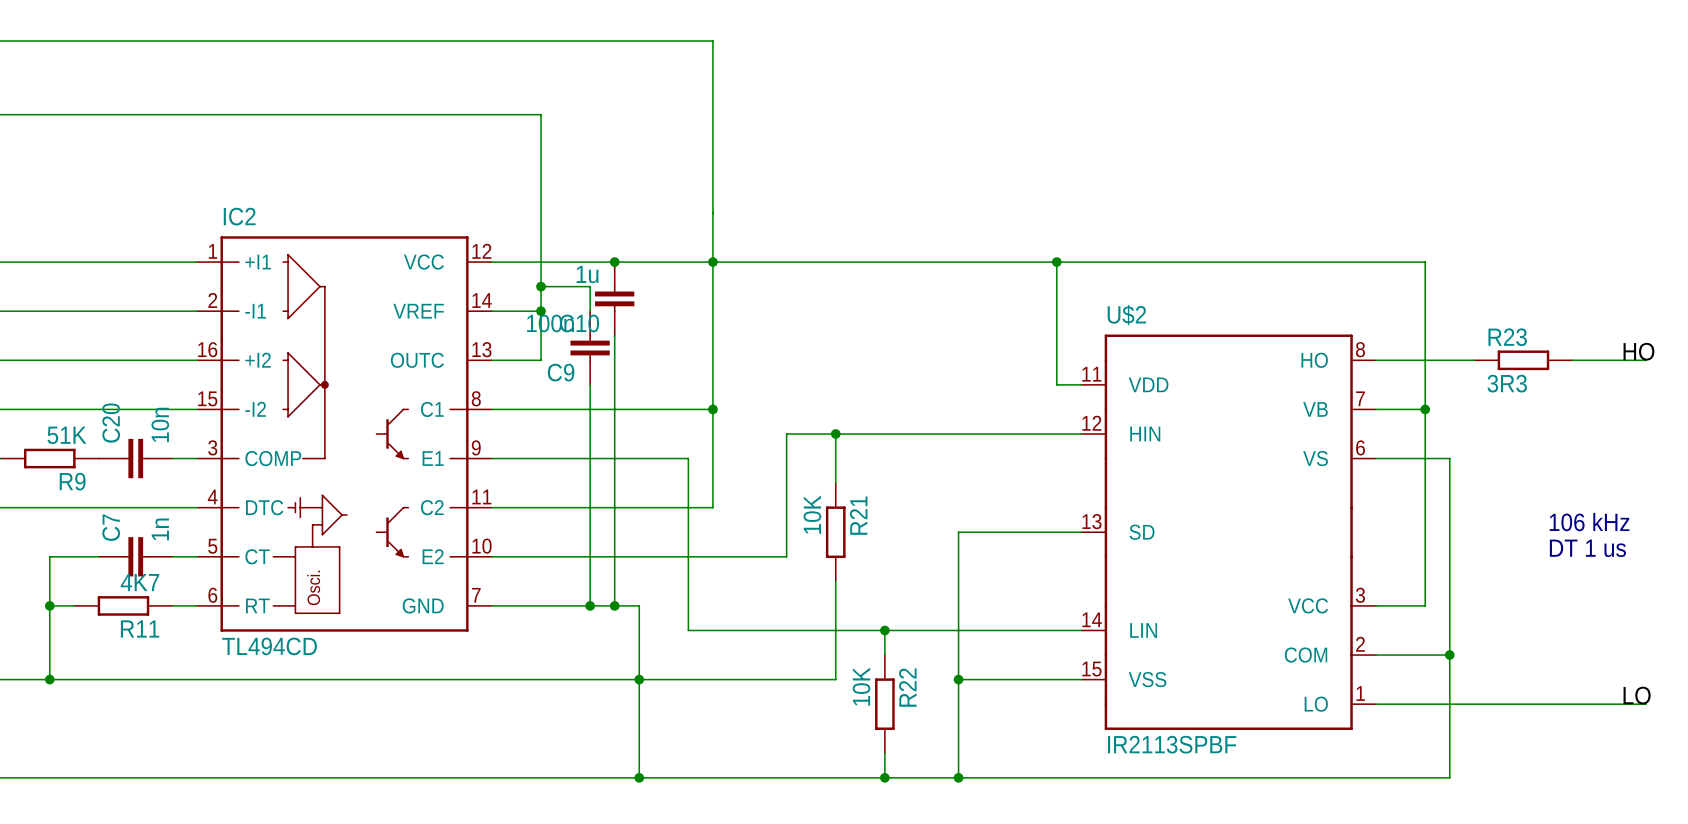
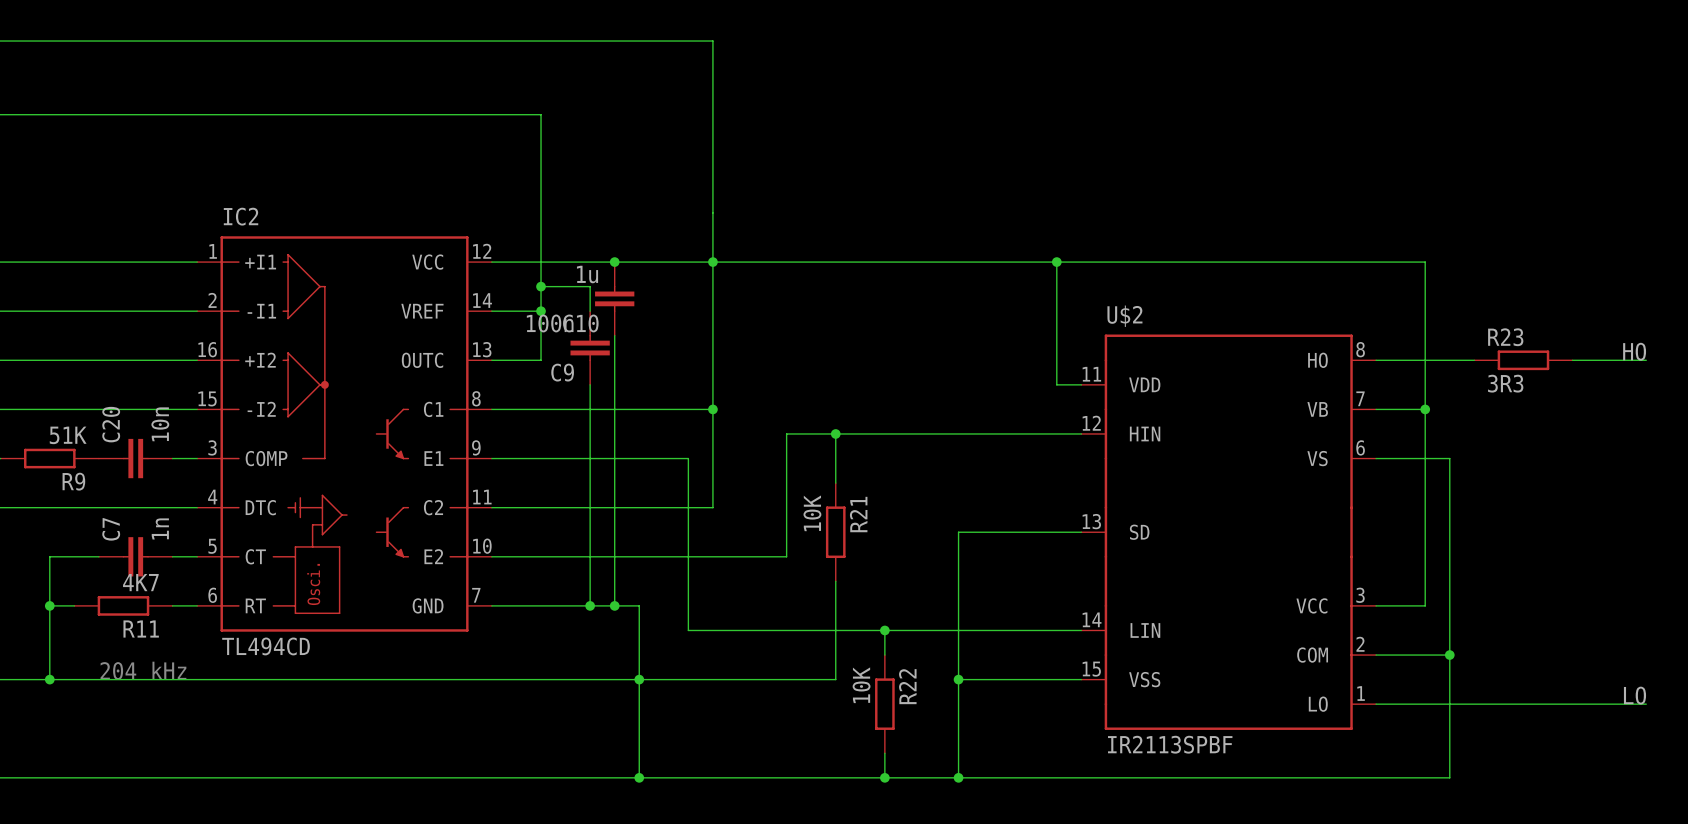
text: 106 kHz (1589, 522) -> none
text: DT 1 us (1587, 548) -> none
text: none -> 204 kHz (143, 670)

